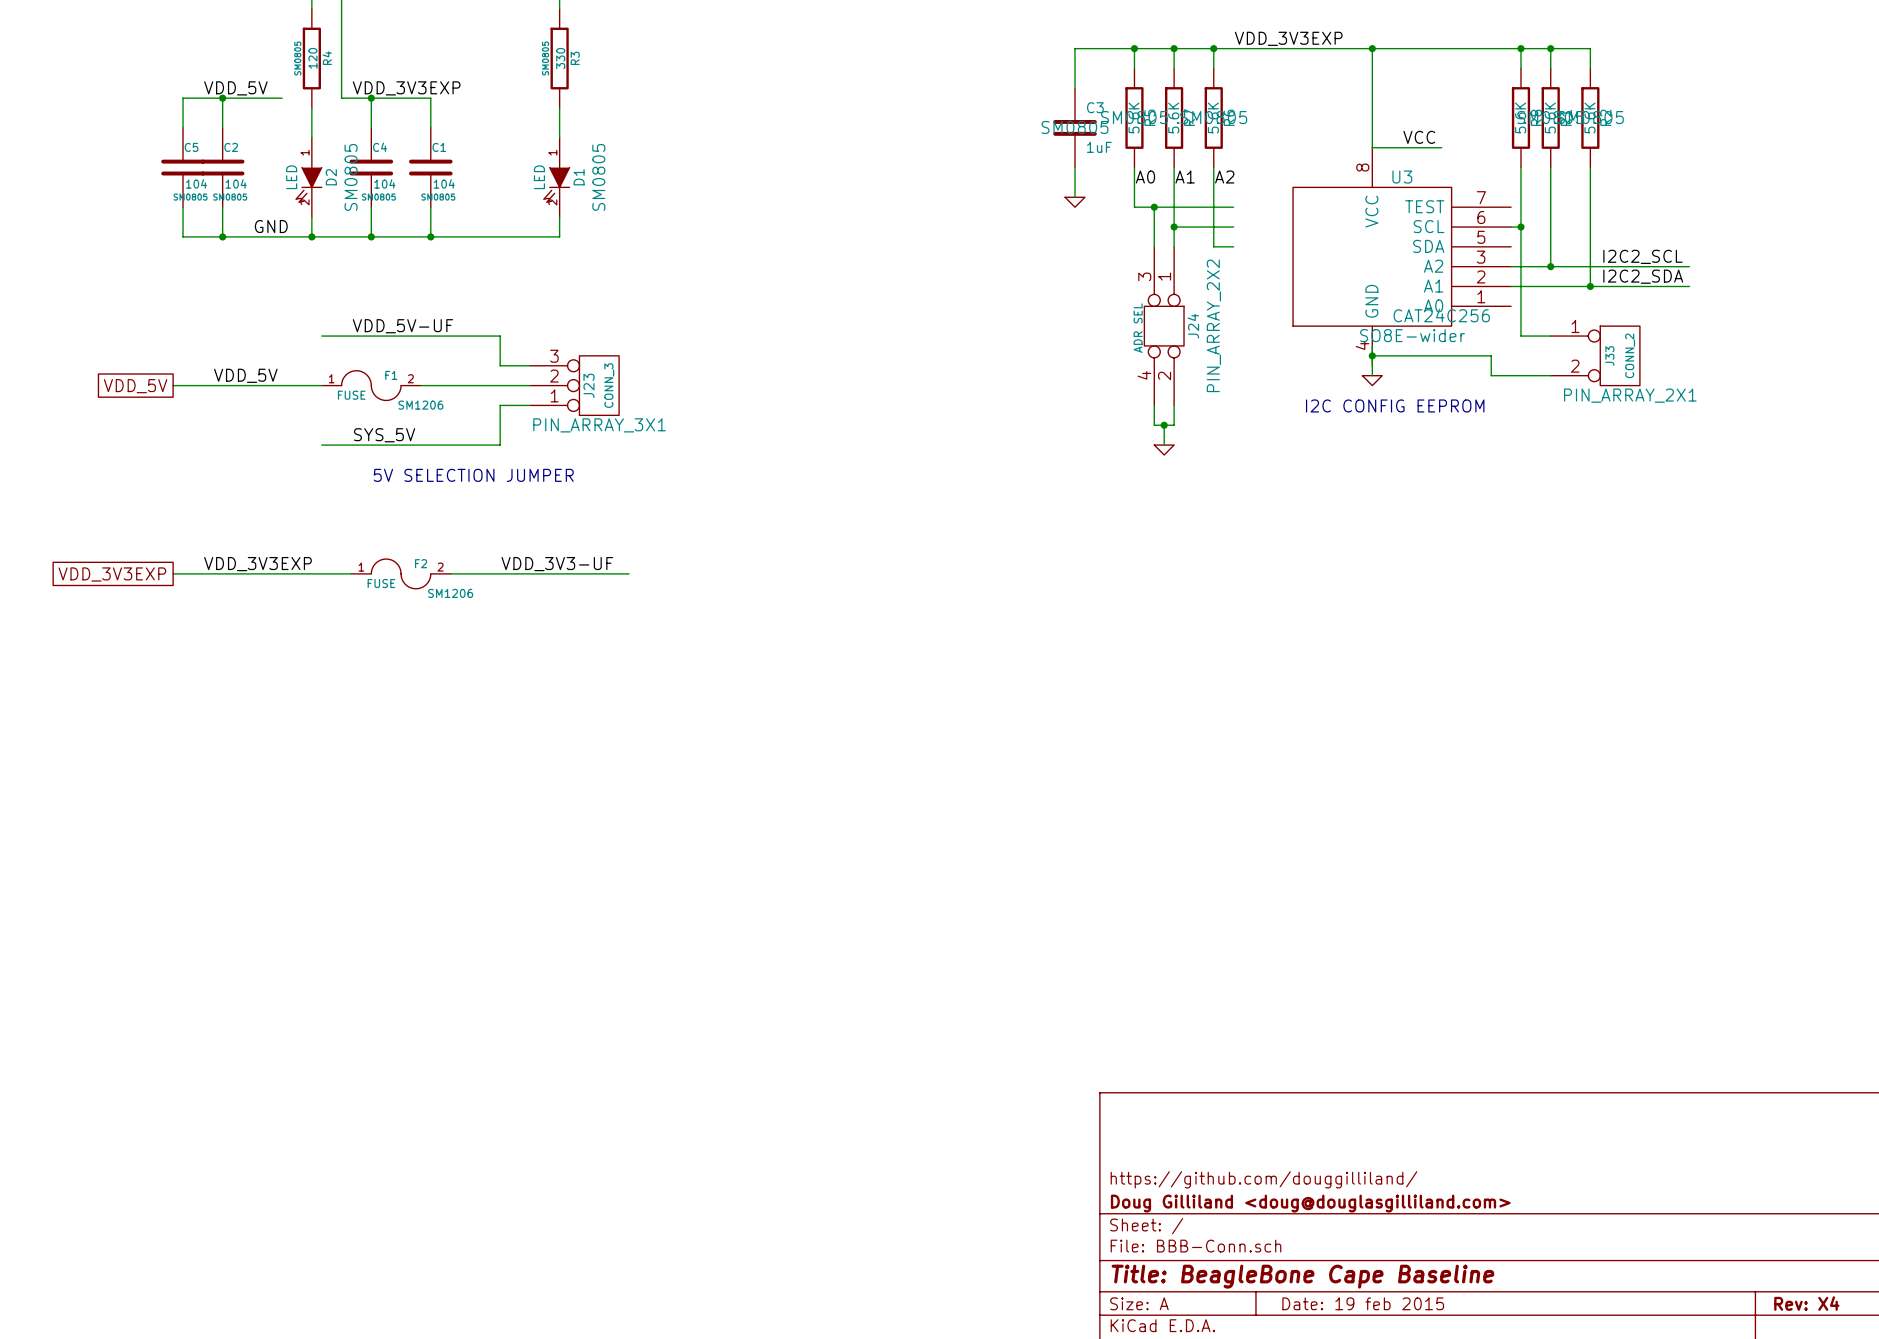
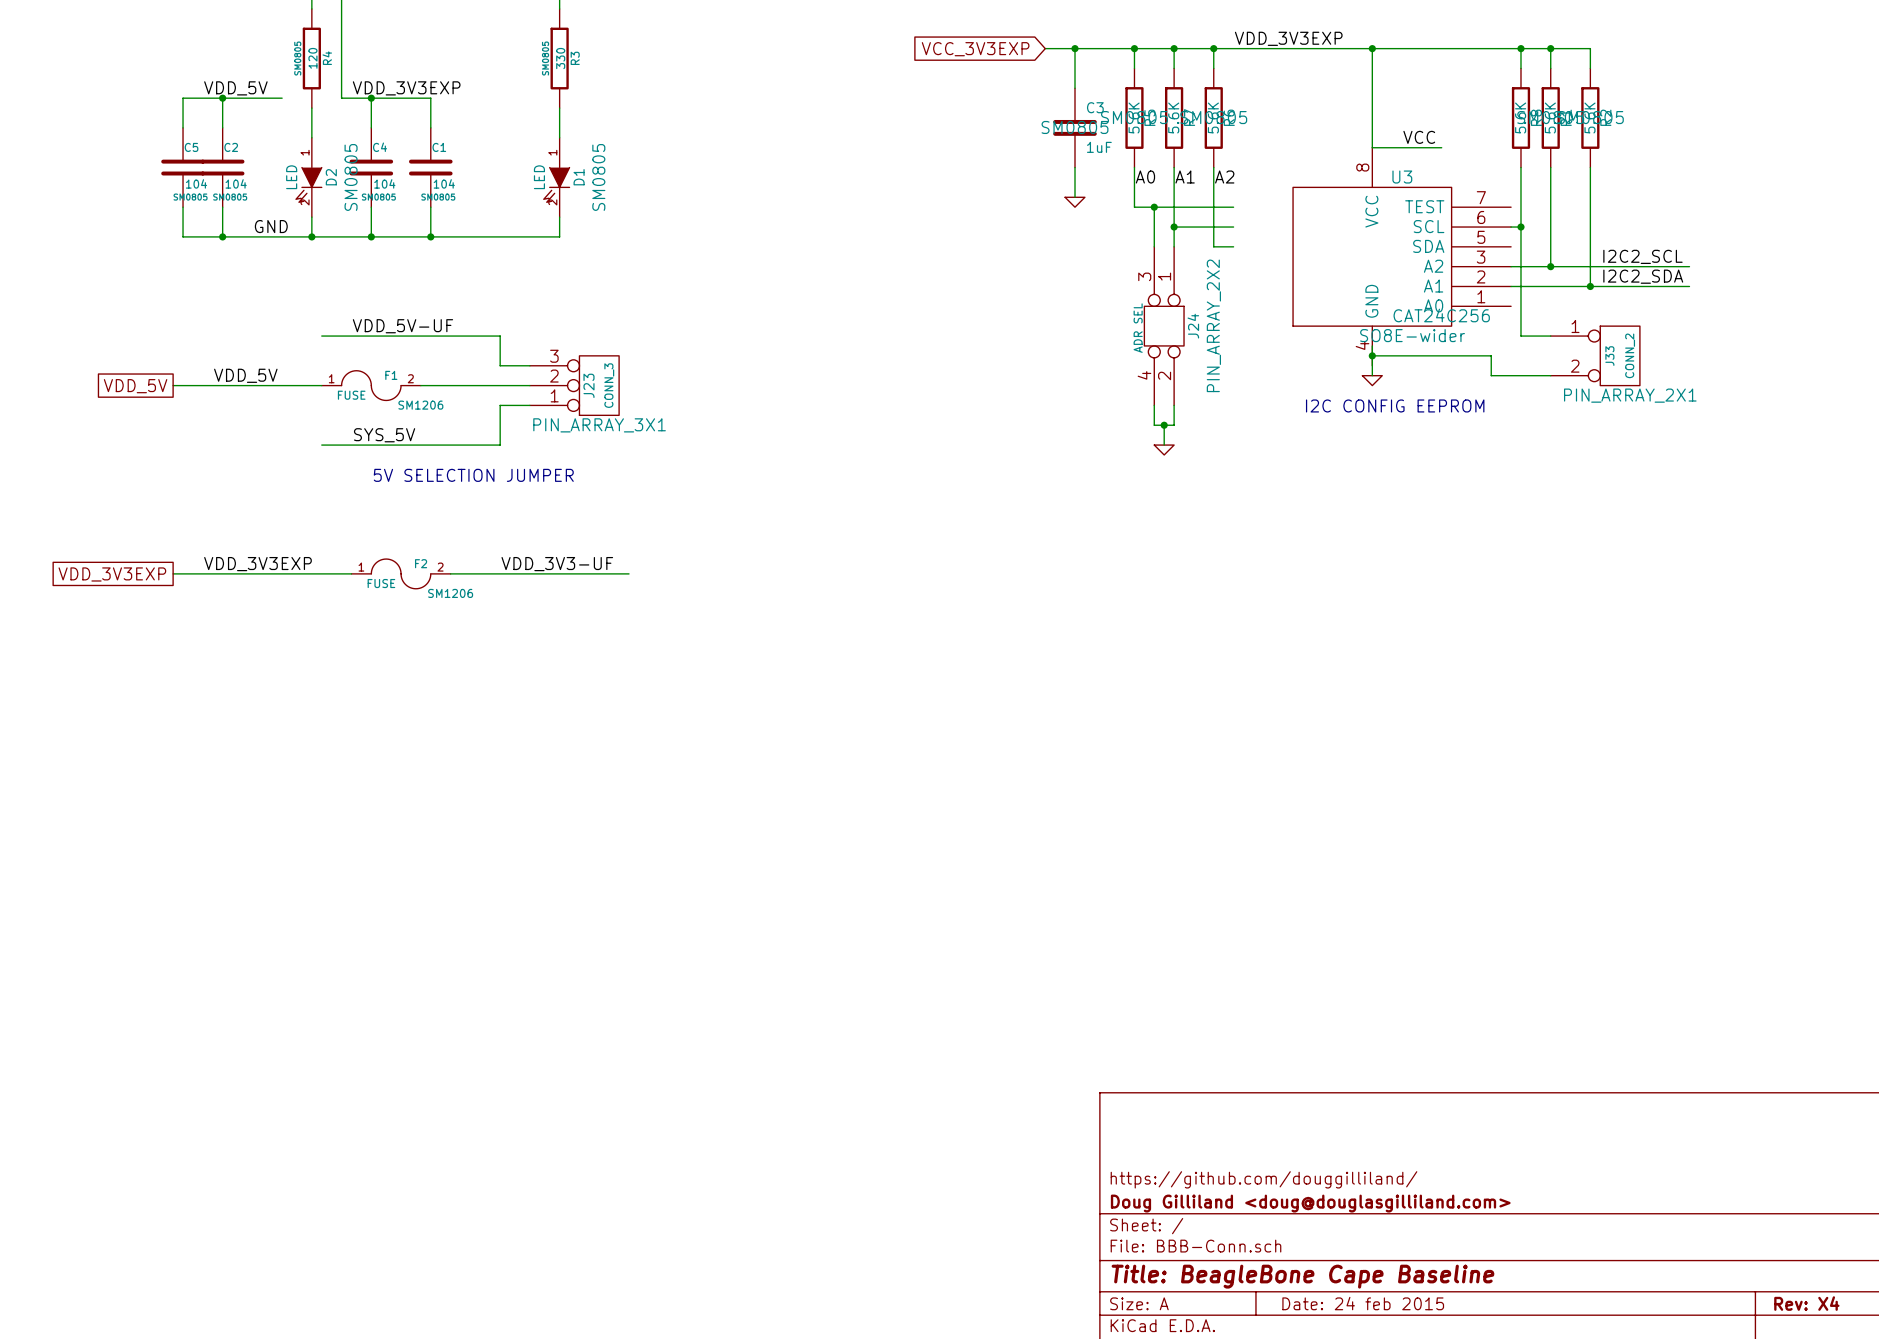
wire: none -> (1045, 48) (1075, 48)
junction: none -> (1075, 48)
global label: none -> VCC_3V3EXP (975, 49)
title block: Date: 19 feb 2015 (1363, 1303) -> Date: 24 feb 2015 (1363, 1303)

